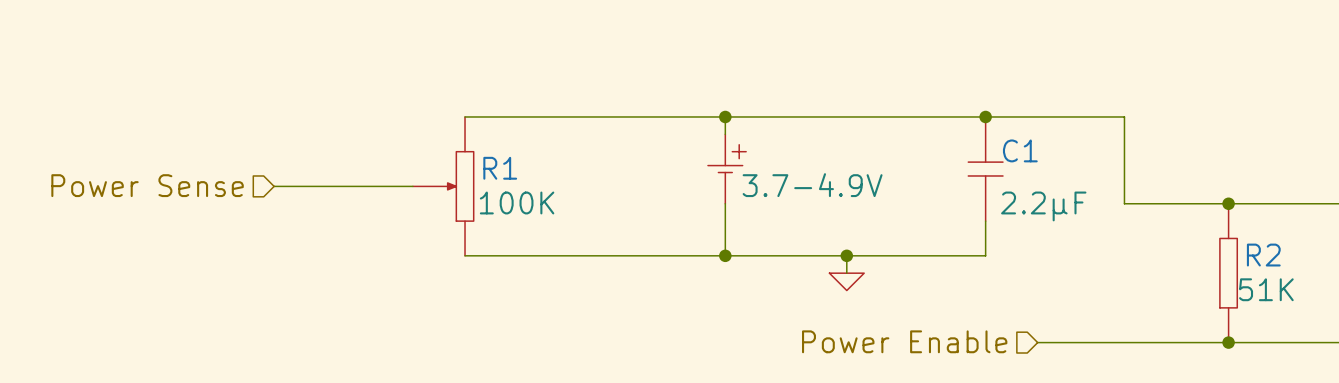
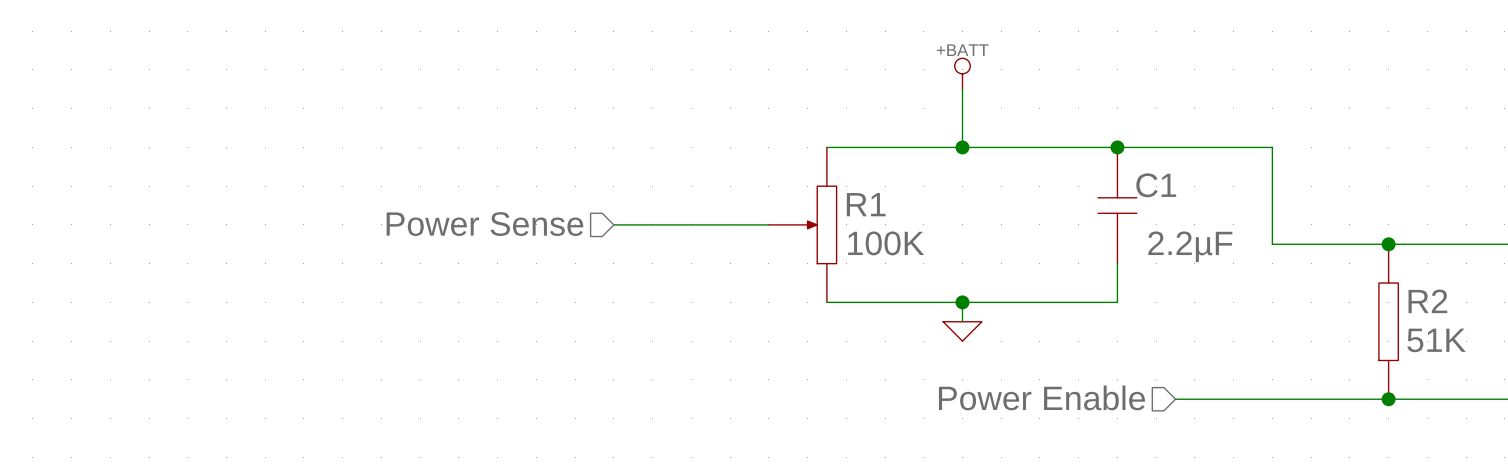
power symbol: none -> +BATT (962, 73)
wire: none -> (962, 89) (962, 147)
wire: (465, 116) (725, 116) (725, 134) -> none
junction: (725, 116) -> none
junction: none -> (962, 147)
part: (727, 169) -> none
hierarchical label position: Power Sense (147, 185) -> Power Sense (484, 224)
wire: (274, 186) (412, 186) -> (613, 224) (768, 224)
R1 position: (443, 186) -> (802, 224)
wire: (725, 203) (725, 255) (465, 255) -> none
junction: (725, 255) -> none

